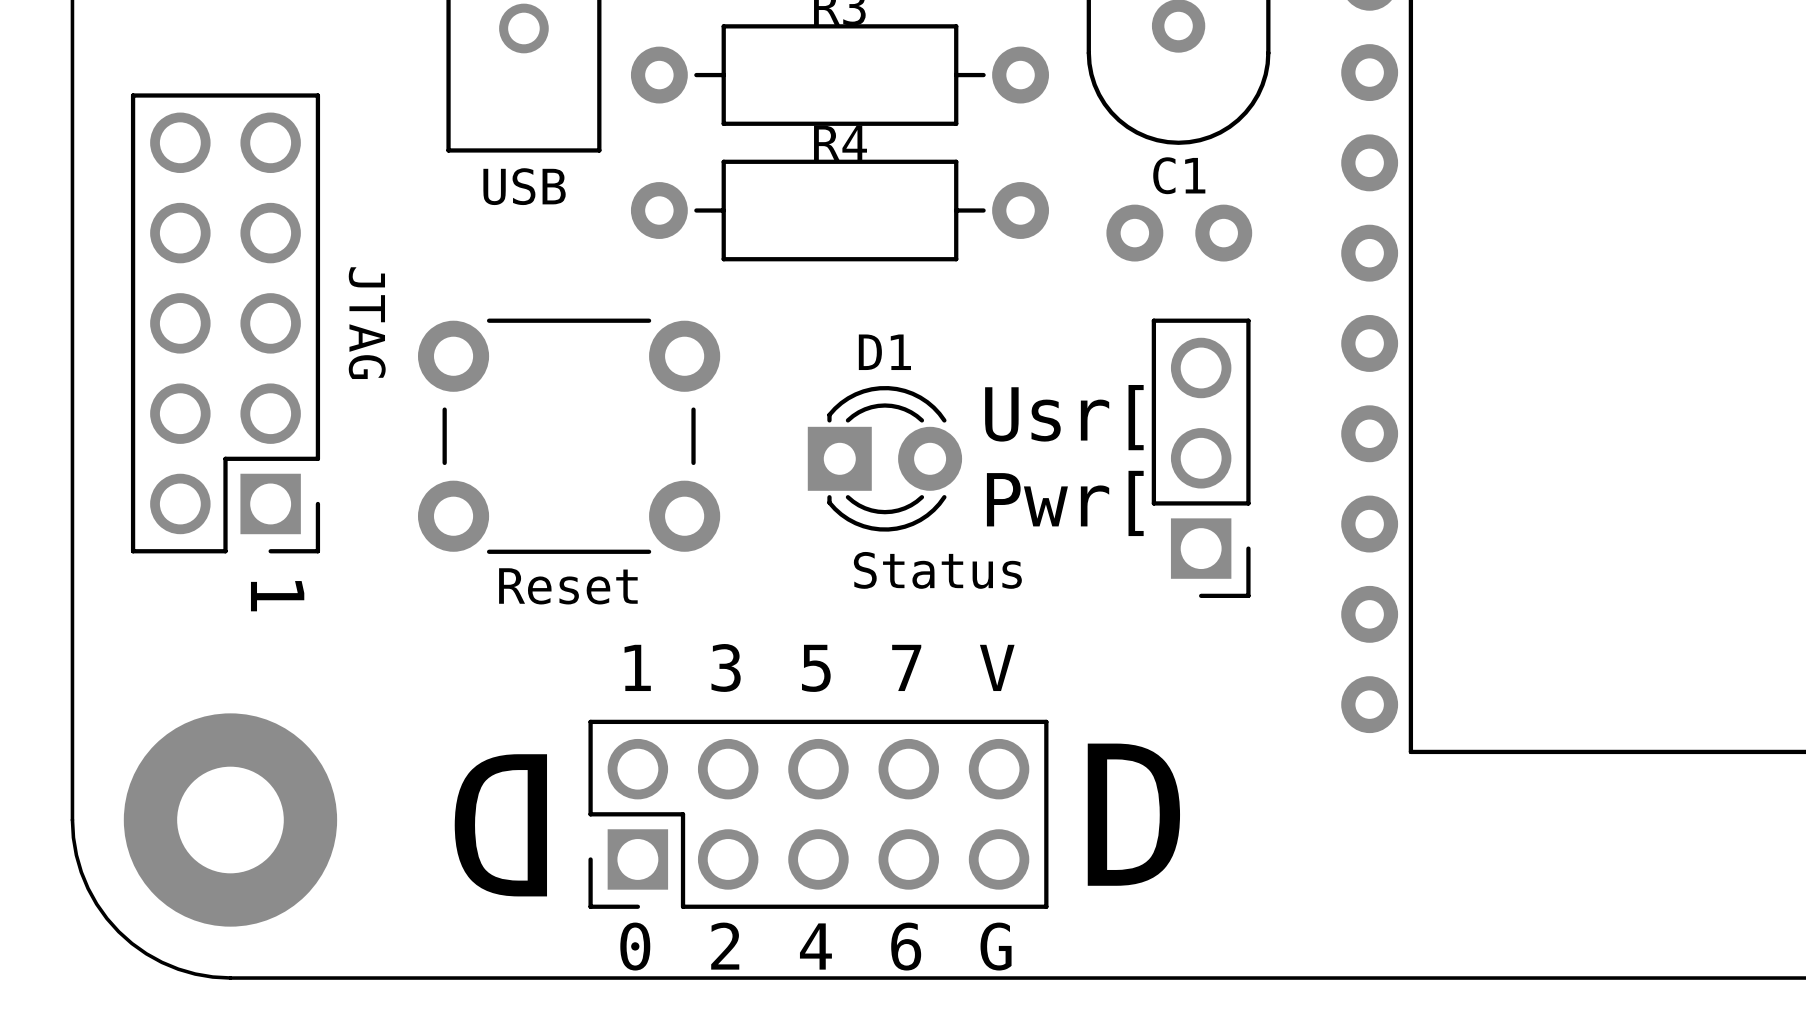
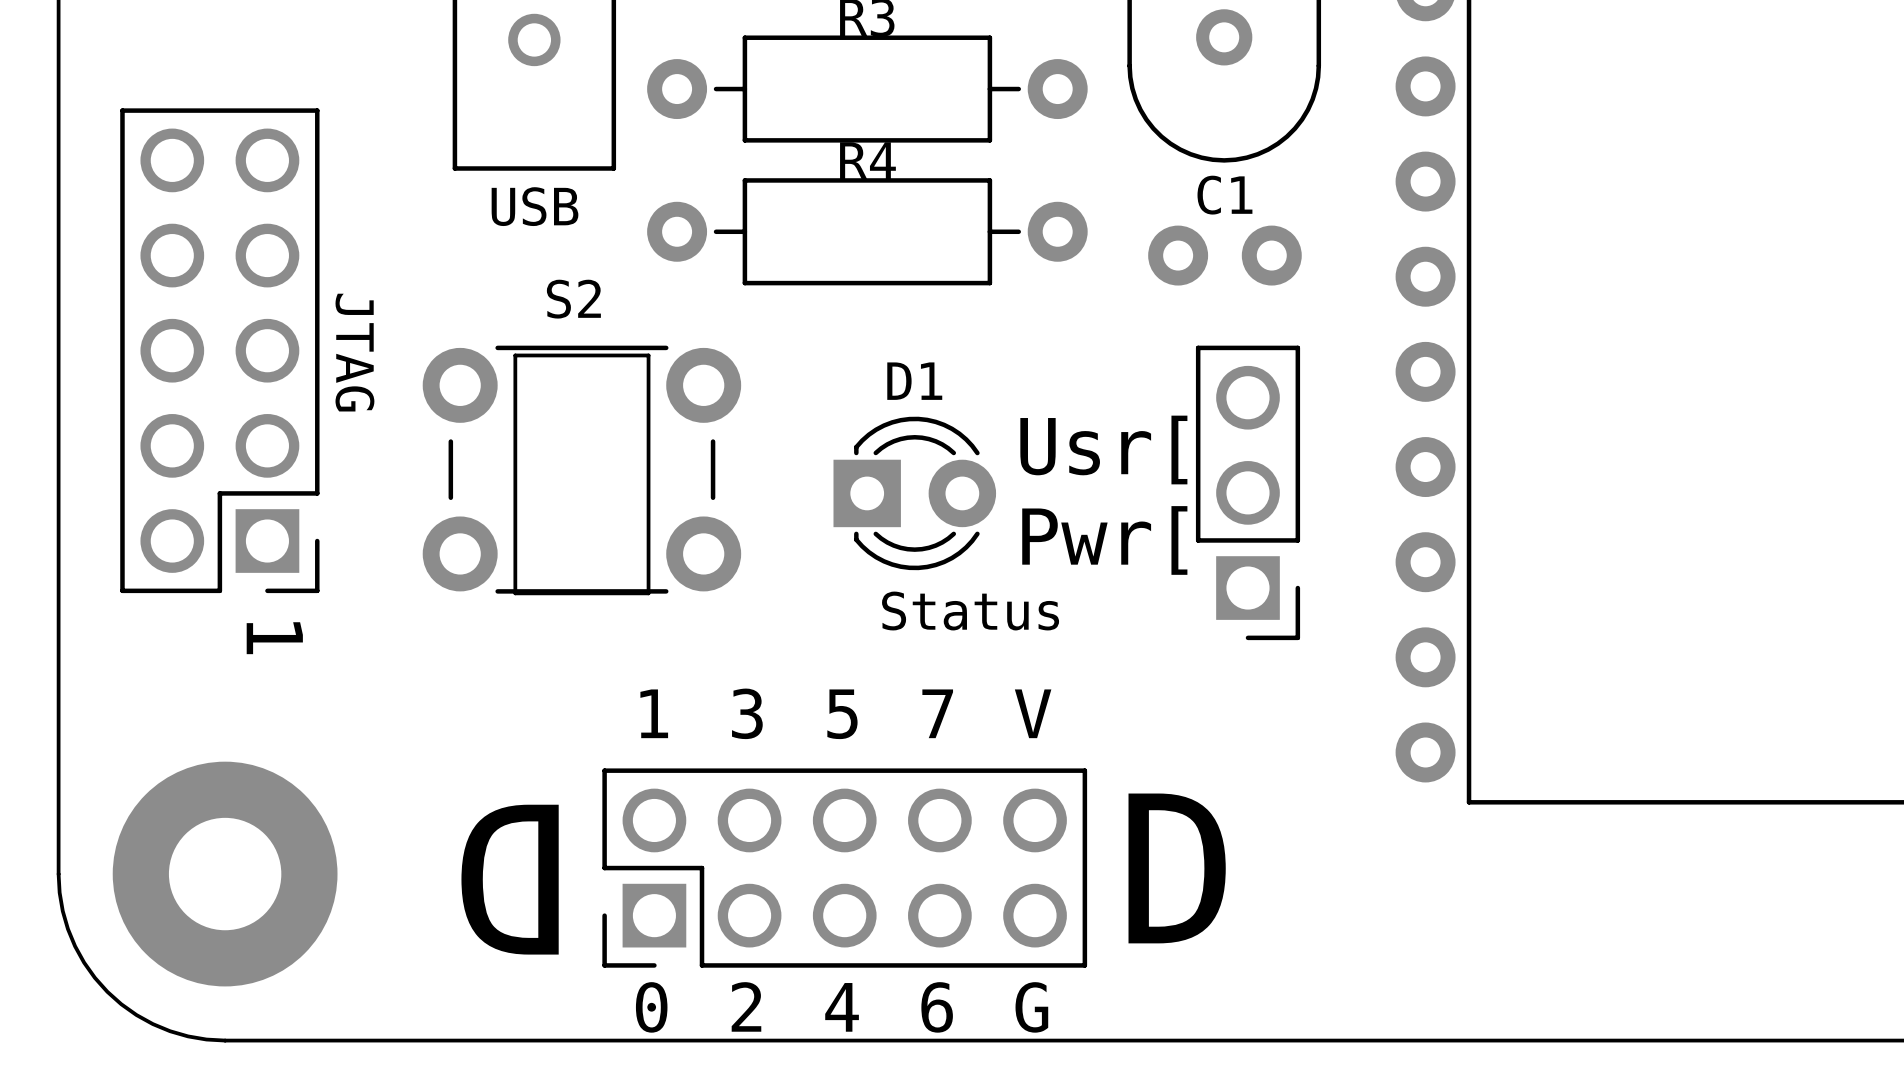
JTAG name: JTAG (367, 323) -> none
text: none -> JTAG (354, 352)
board edge: none -> (515, 355) (648, 355) (648, 593) (515, 593) (515, 355)
Reset name: Reset (568, 586) -> S2 (573, 299)

